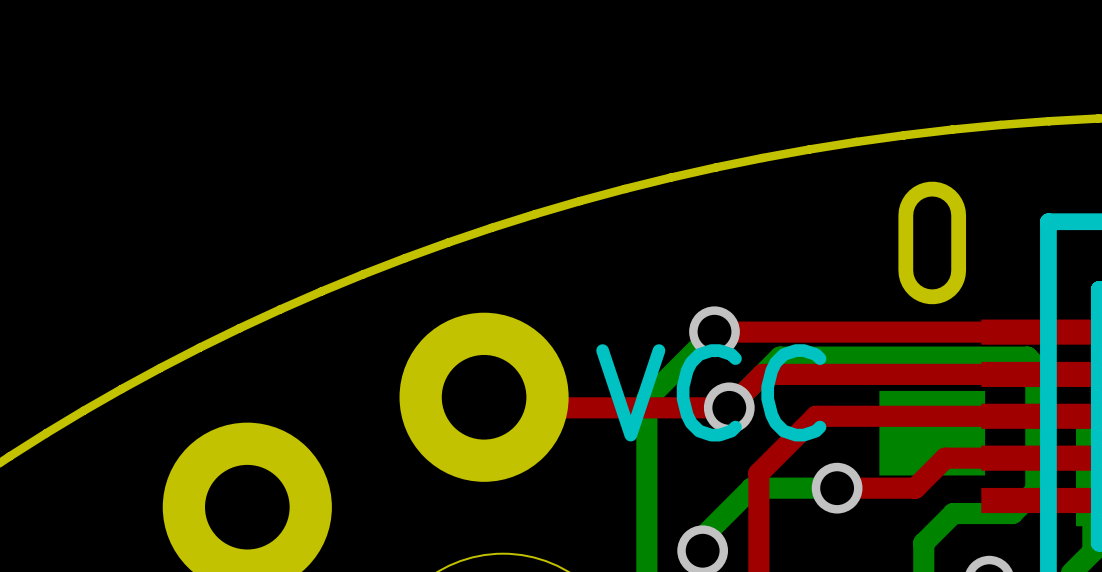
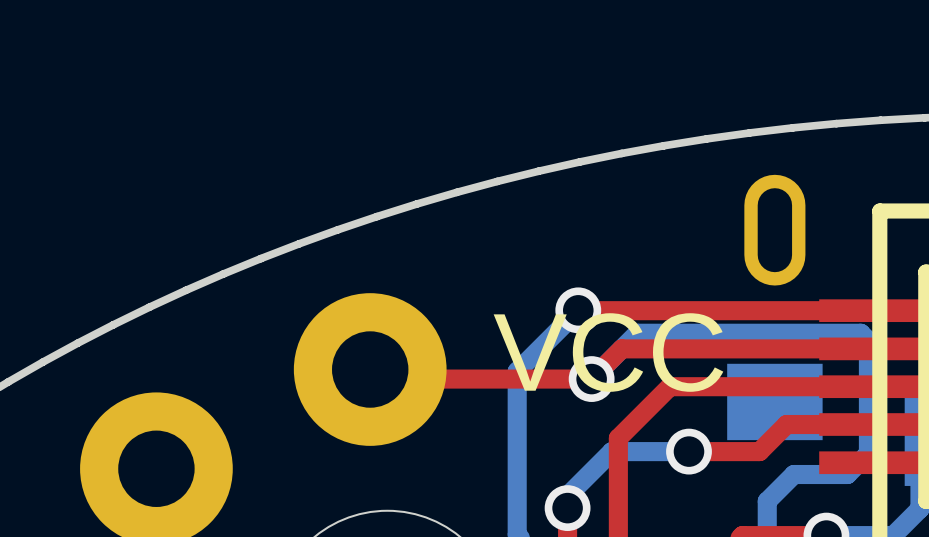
VCC name position: VCC (711, 392) -> VCC (608, 352)

